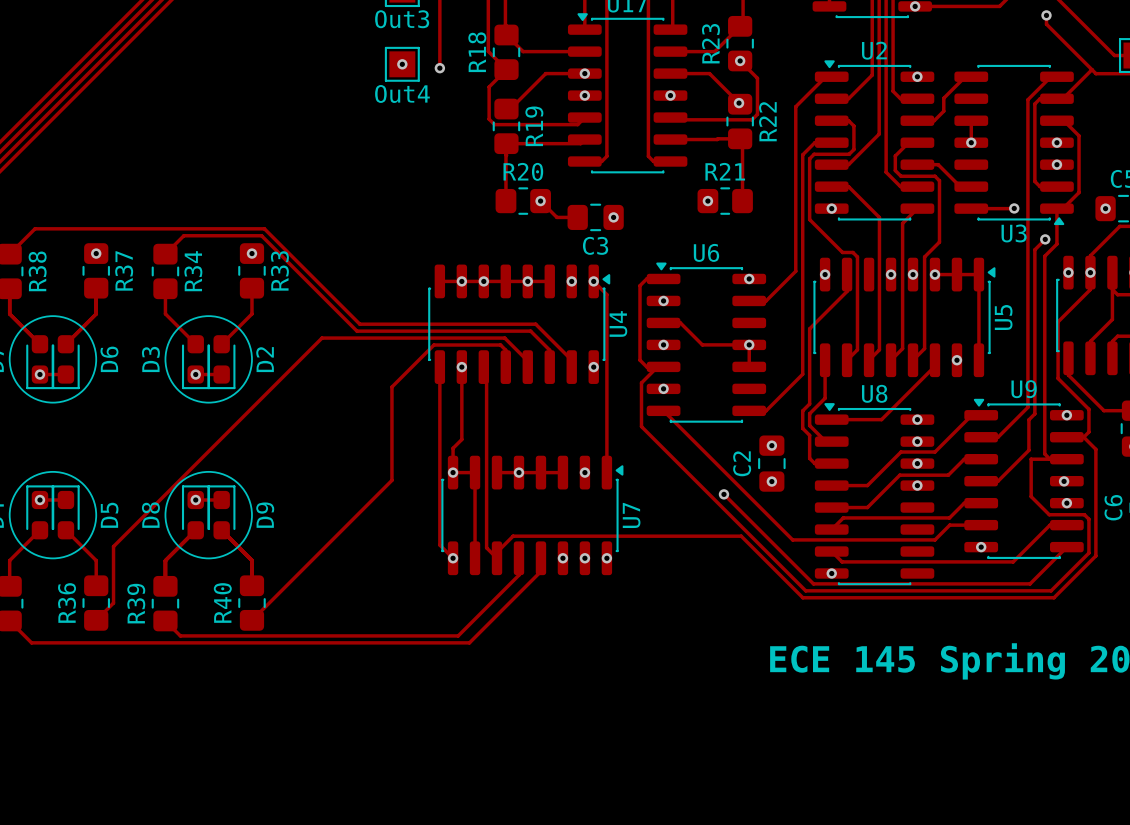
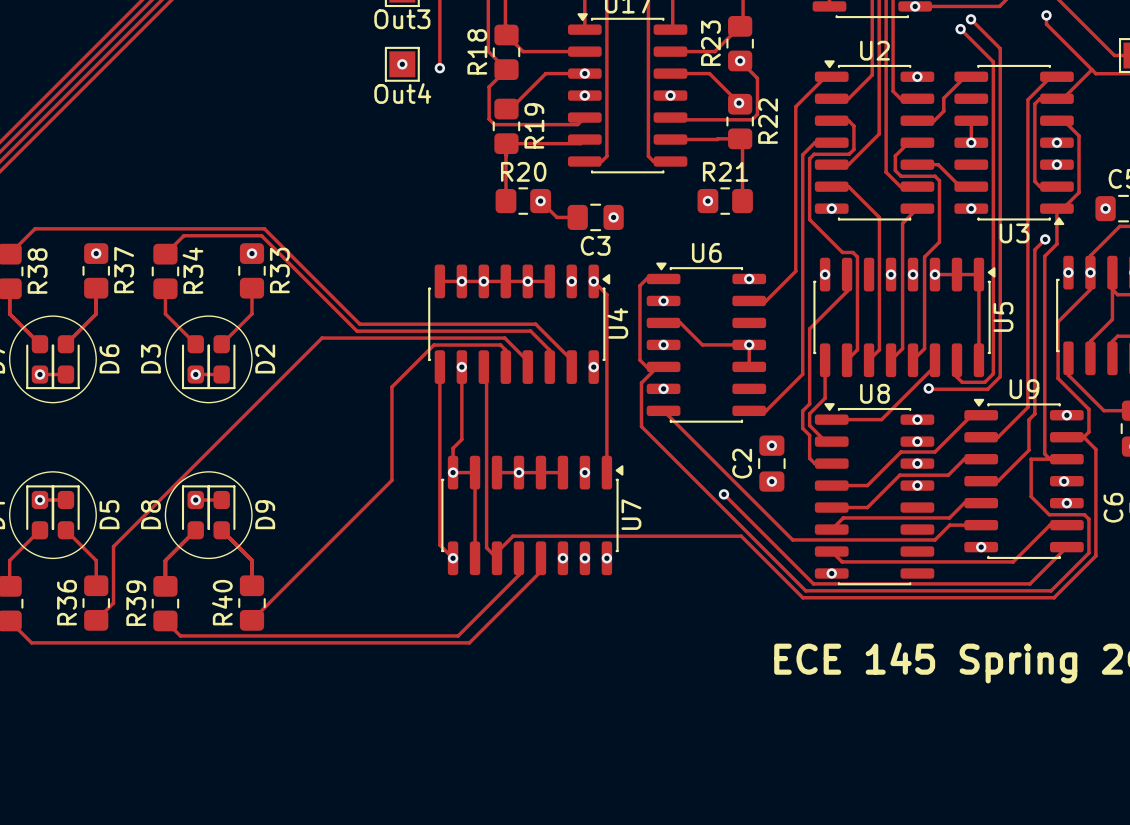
track: none -> (971, 19) (1000, 48) (1000, 376) (987, 389) (928, 388)
via: none -> (971, 19)
track: none -> (960, 29) (993, 61) (993, 373) (984, 382) (962, 382) (956, 377) (956, 360)
via: none -> (960, 29)
track: (971, 208) (1014, 208) -> none
via position: (1014, 208) -> (971, 208)
via position: (956, 360) -> (928, 388)

